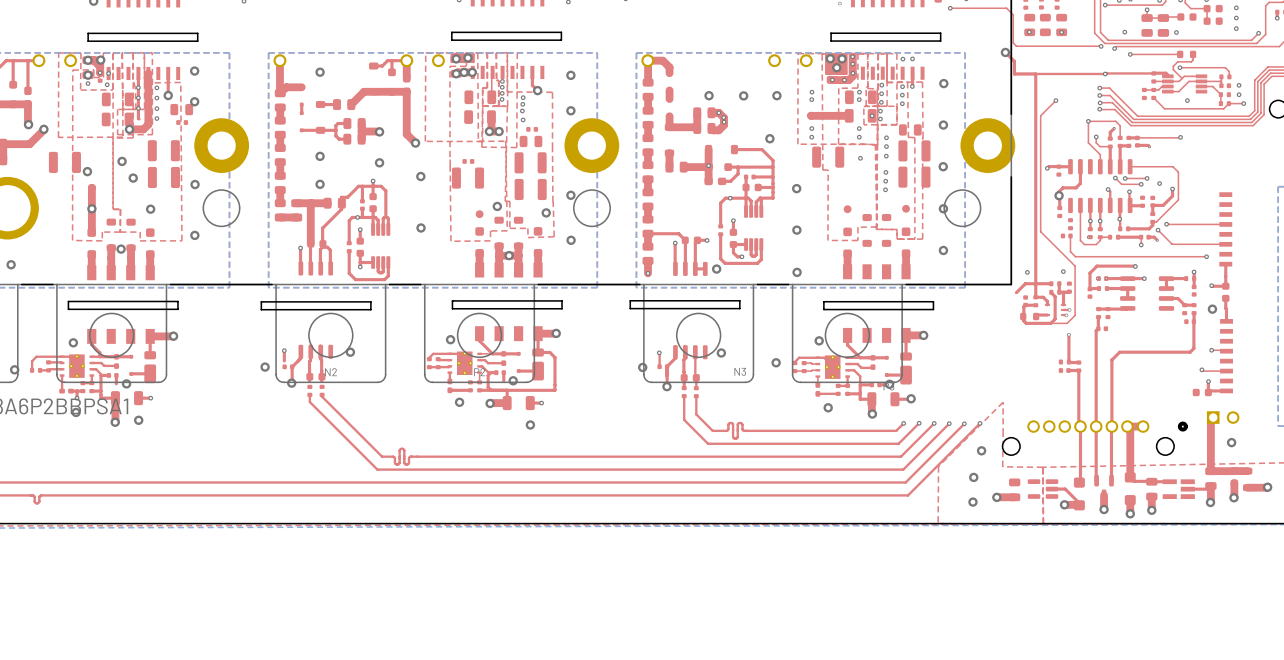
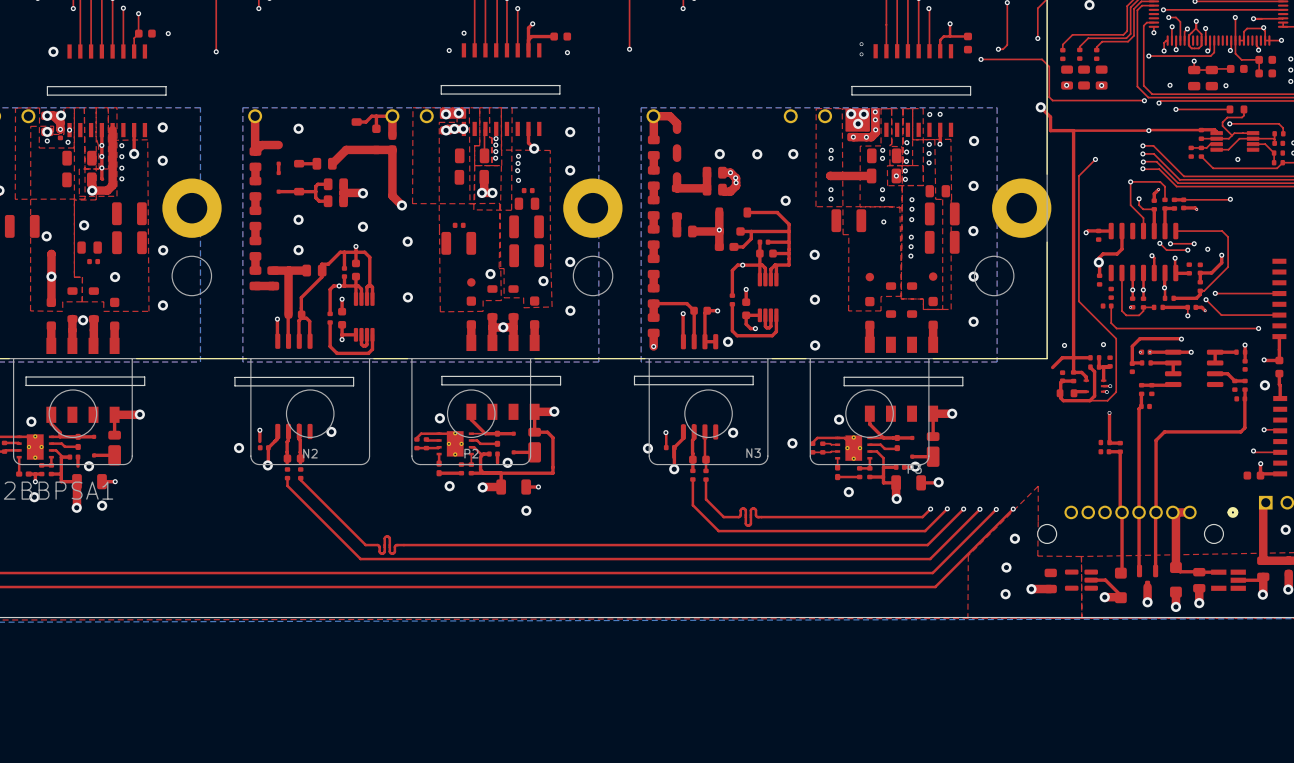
part position: (181, 109) -> (89, 247)
part position: (182, 122) -> (93, 261)
via: (133, 178) -> none

